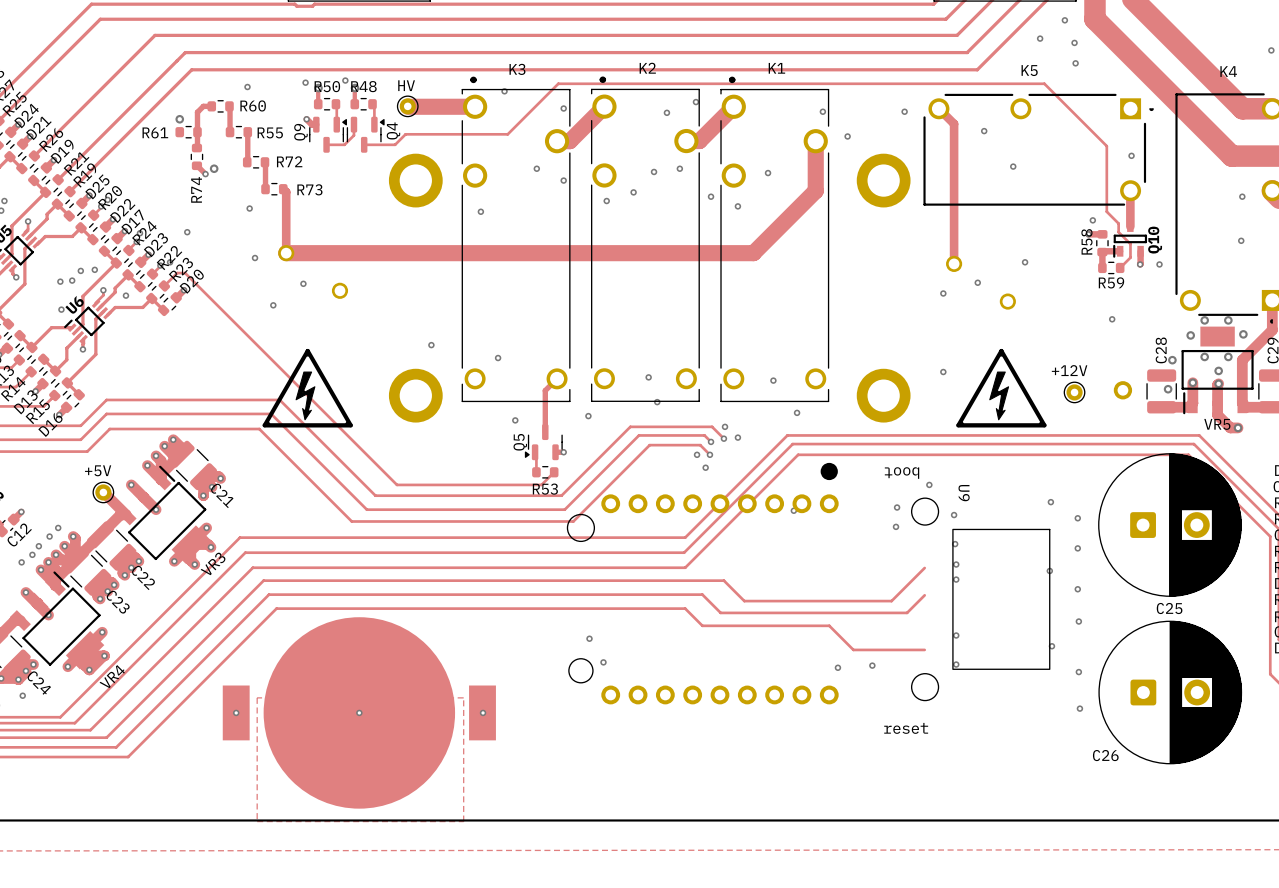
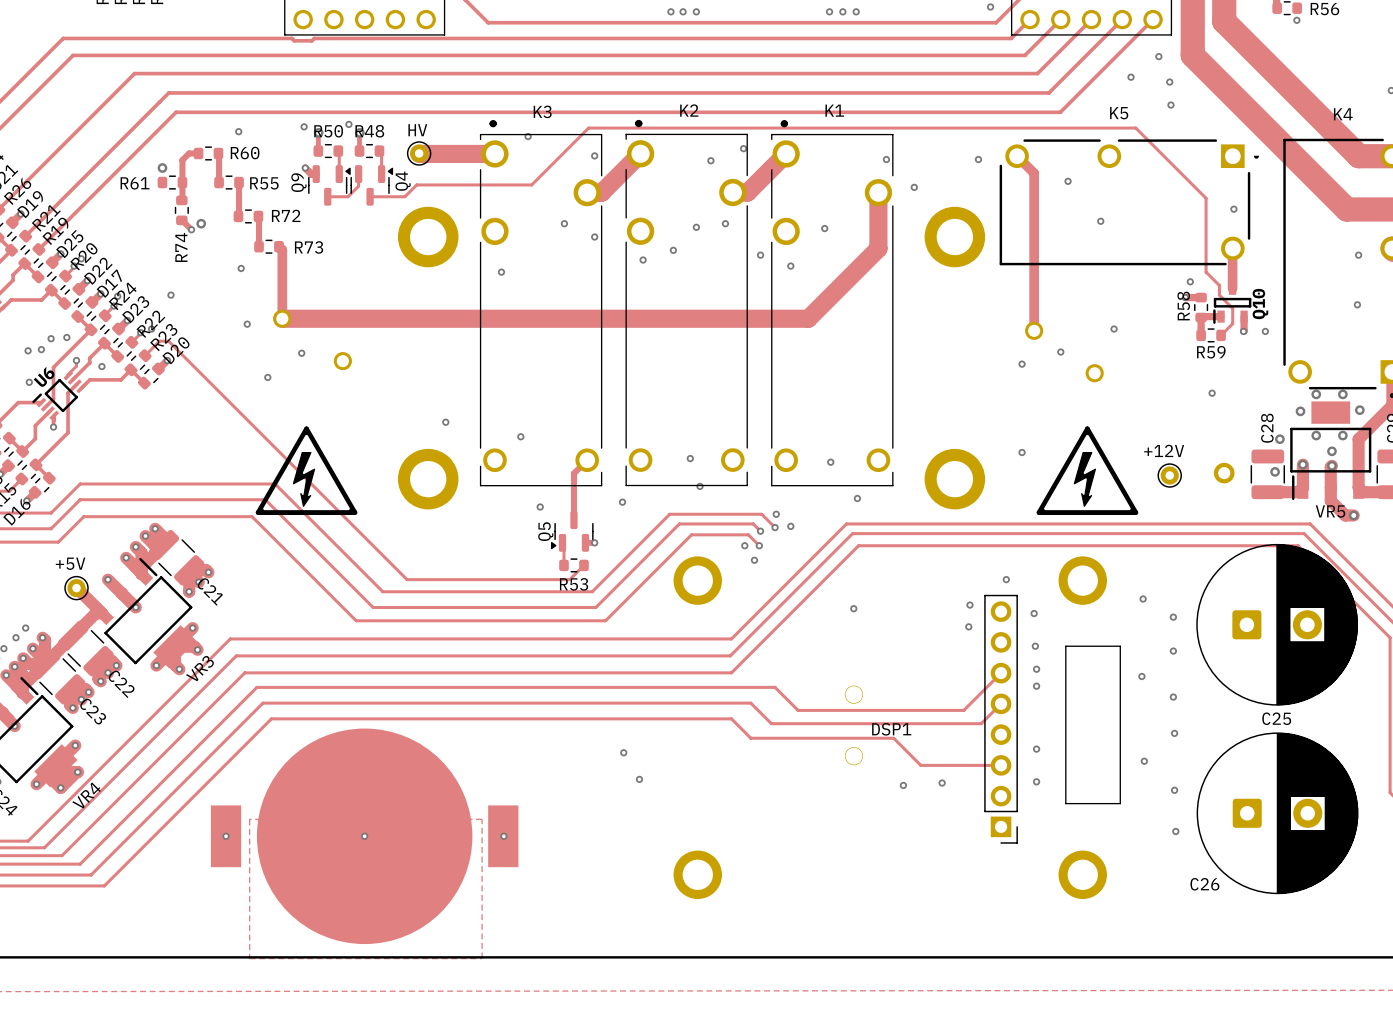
U9: (808, 583) -> none
DSP1: none -> (897, 727)

